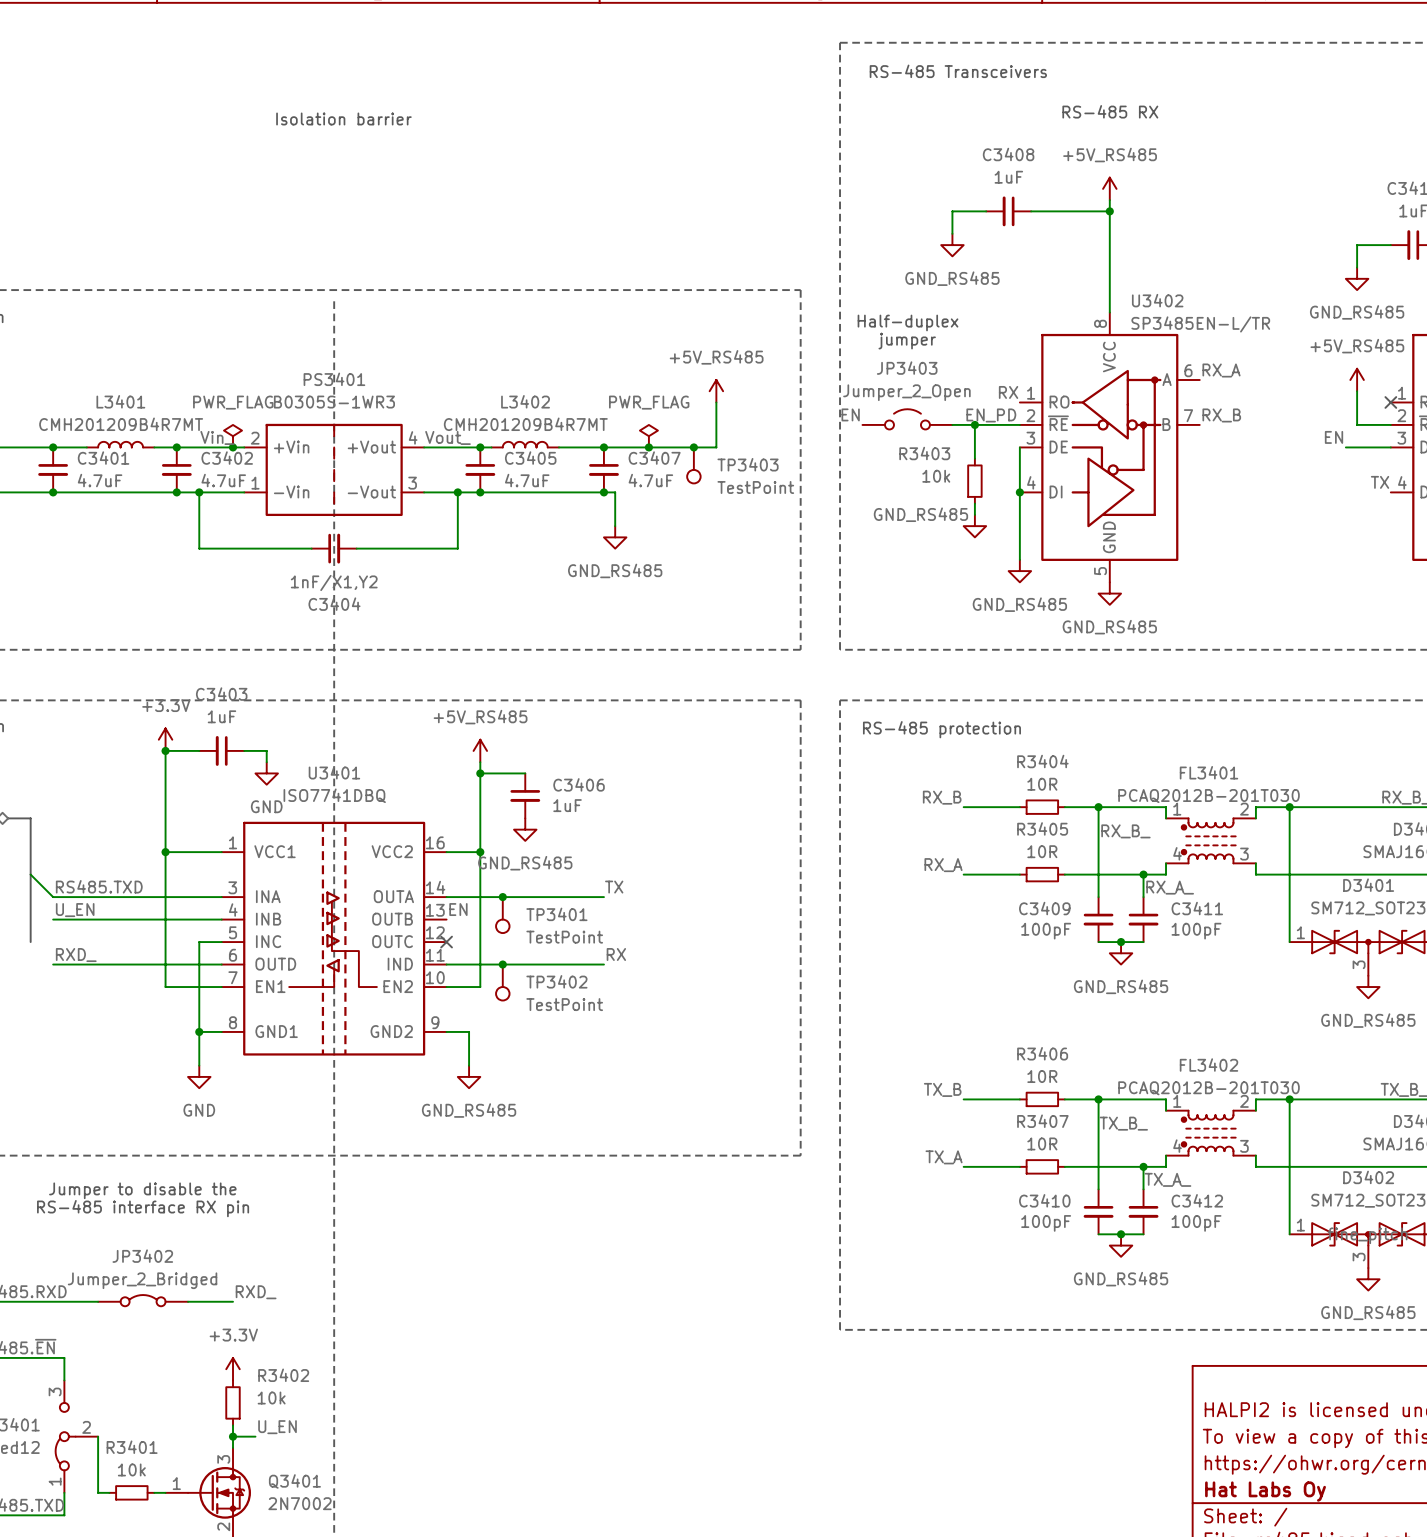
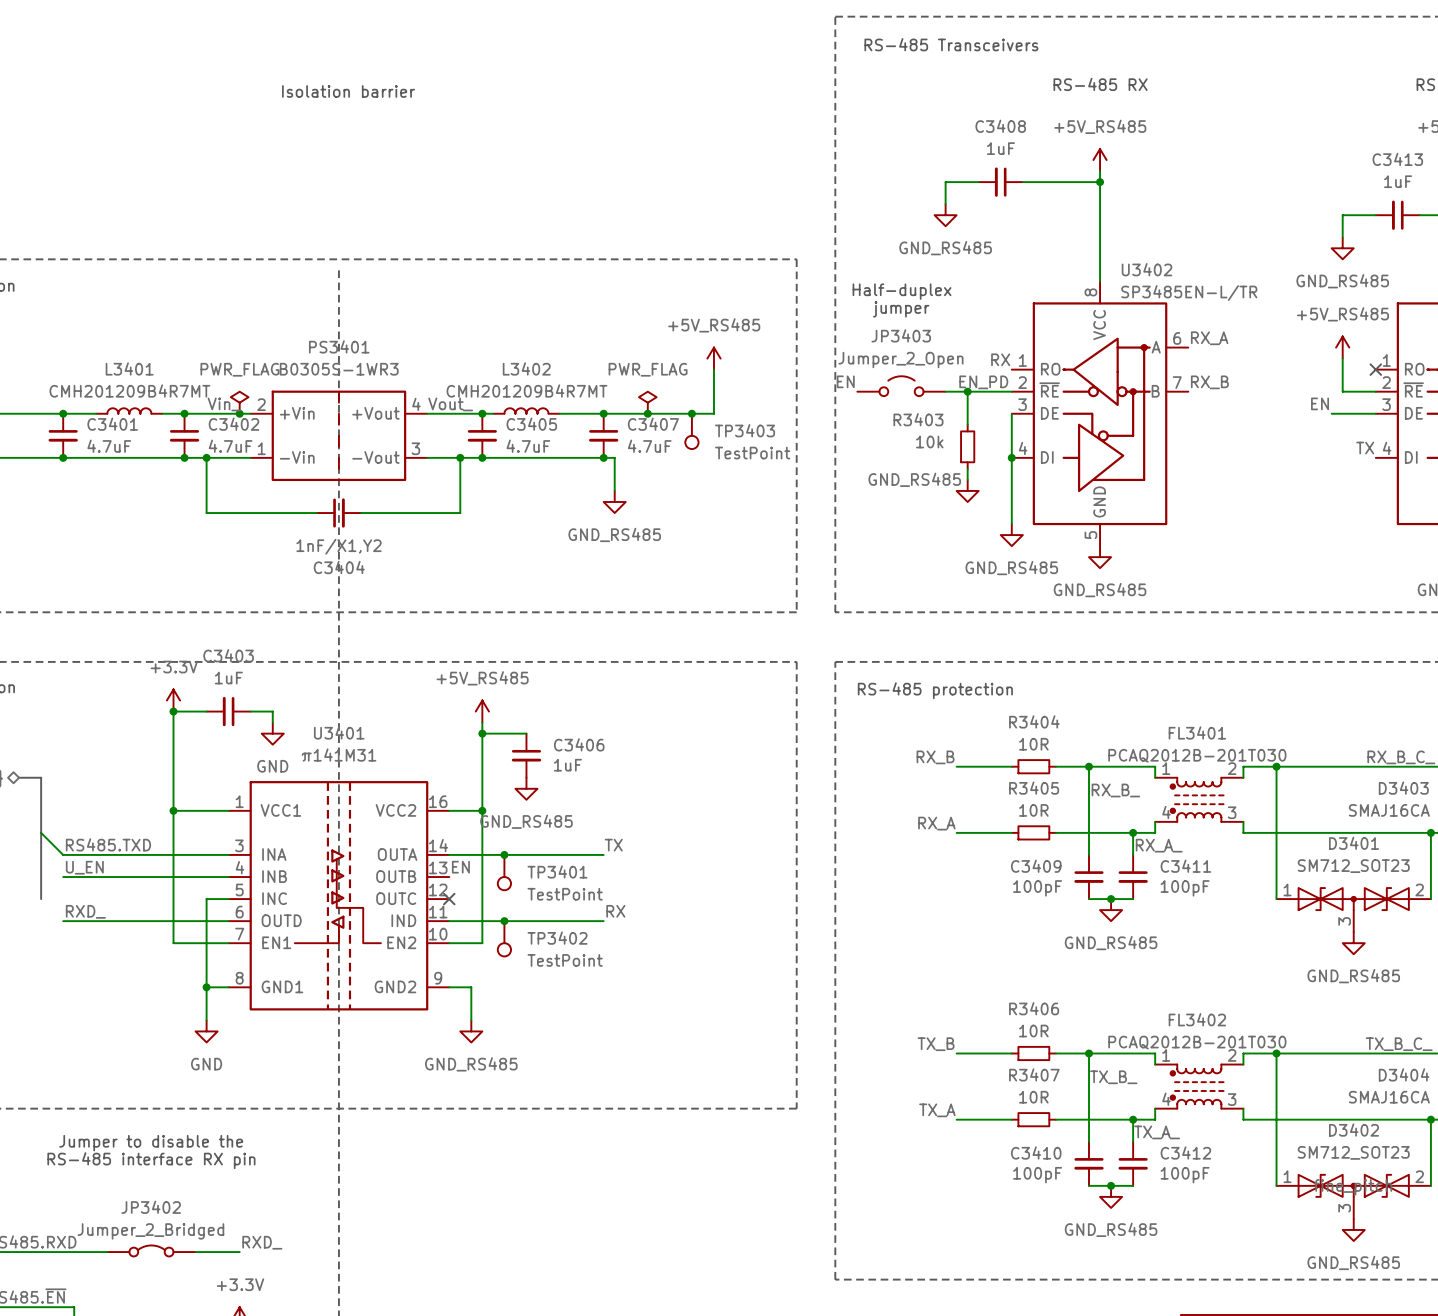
U3401 value: ISO7741DBQ (334, 795) -> π141M31 (338, 755)

